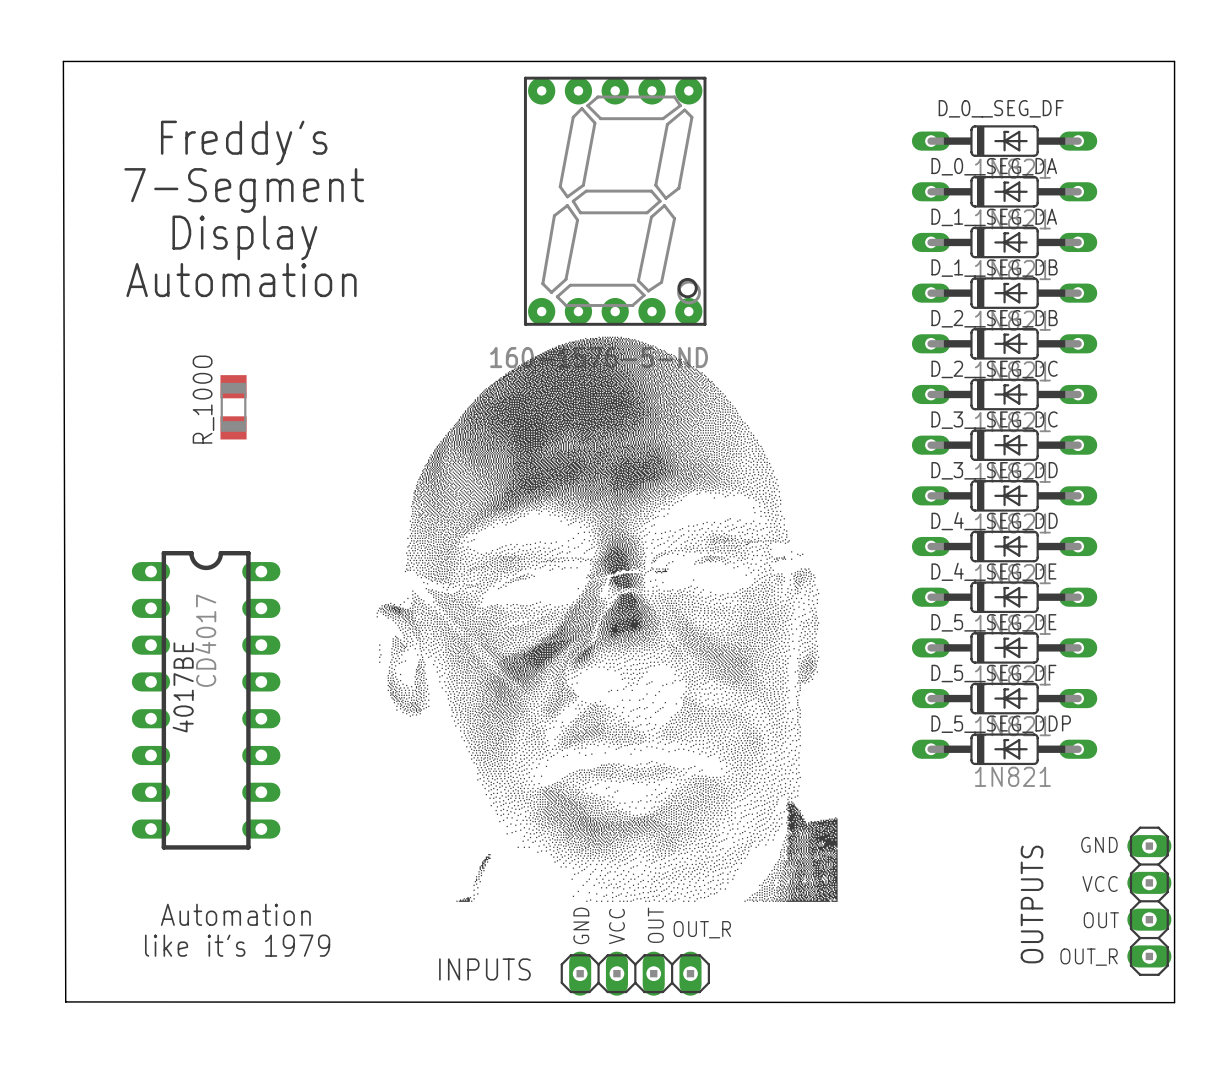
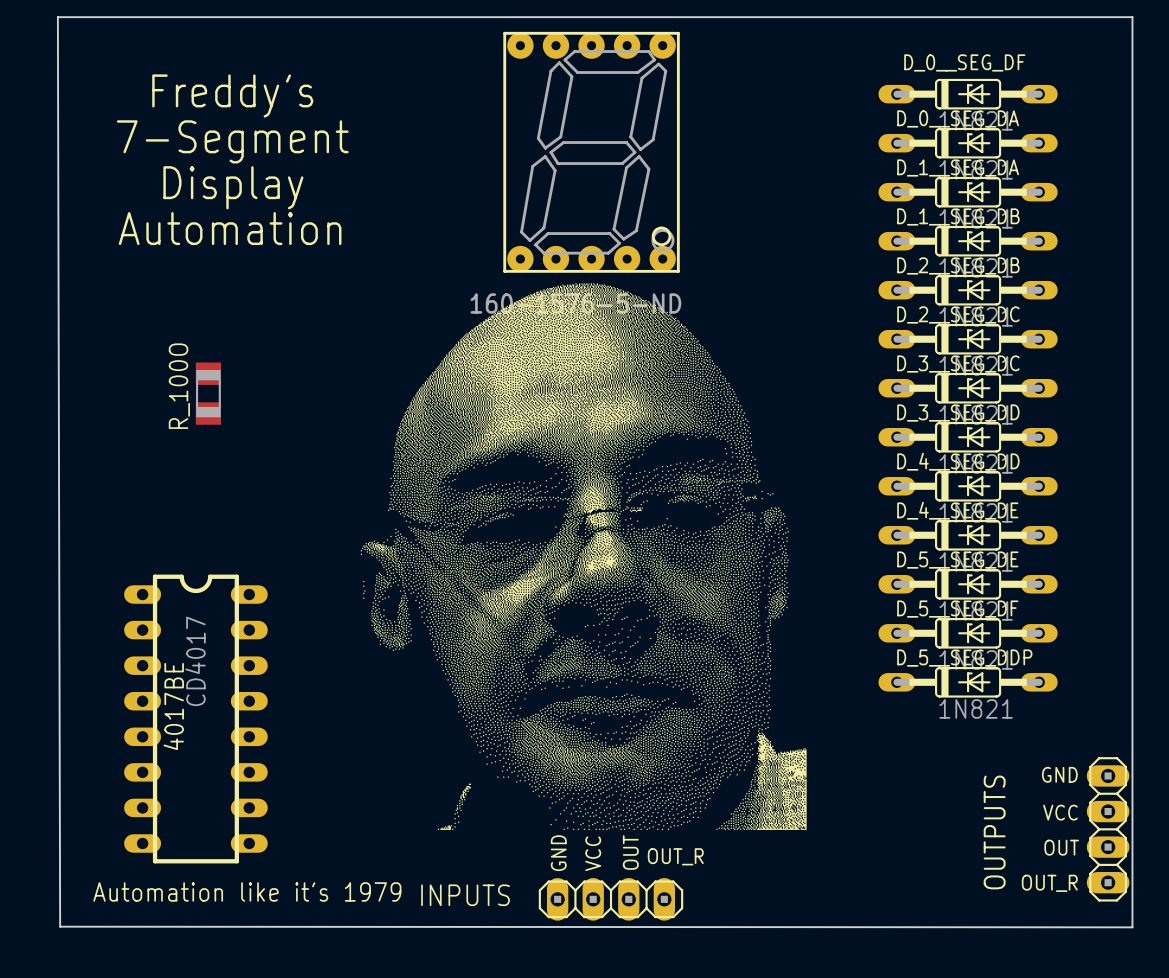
R_100O position: (233, 407) -> (208, 393)
4017BE position: (206, 700) -> (195, 719)
text: Automation (235, 914) -> none
text: like it's 1979 (237, 945) -> Automation like it's 1979 (247, 891)

